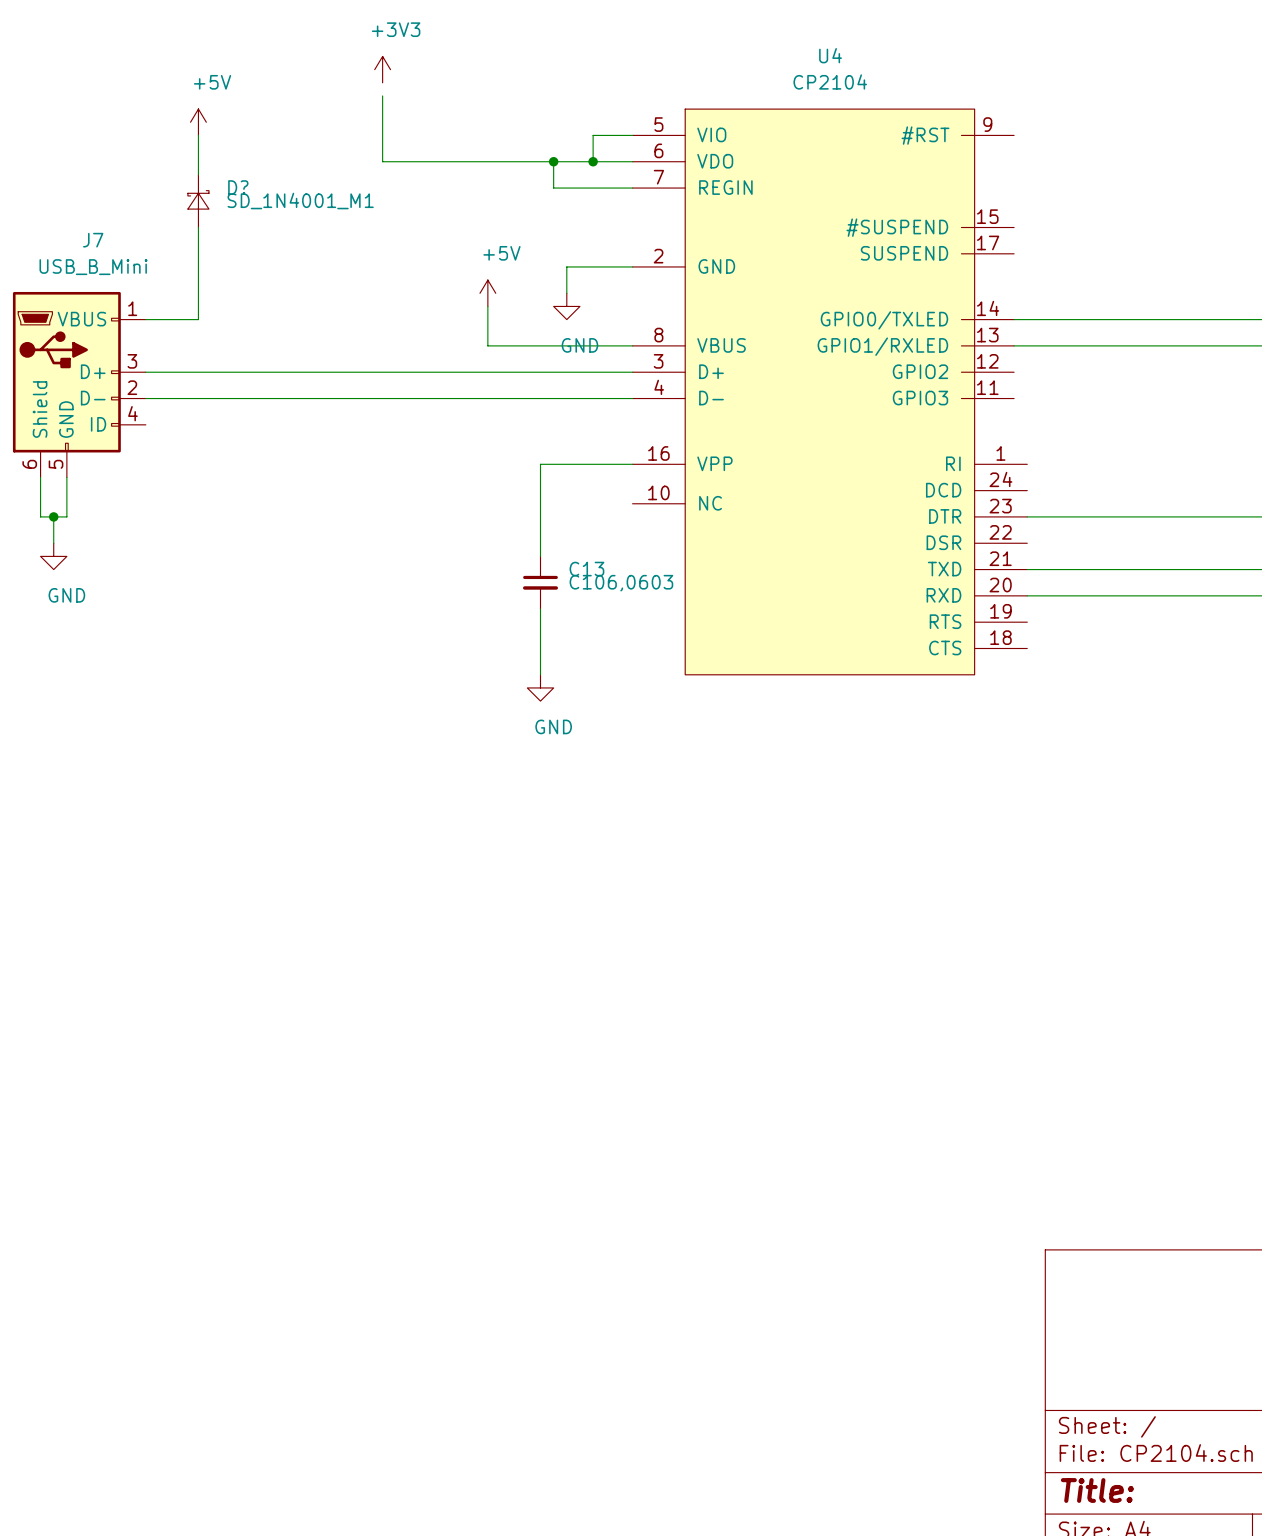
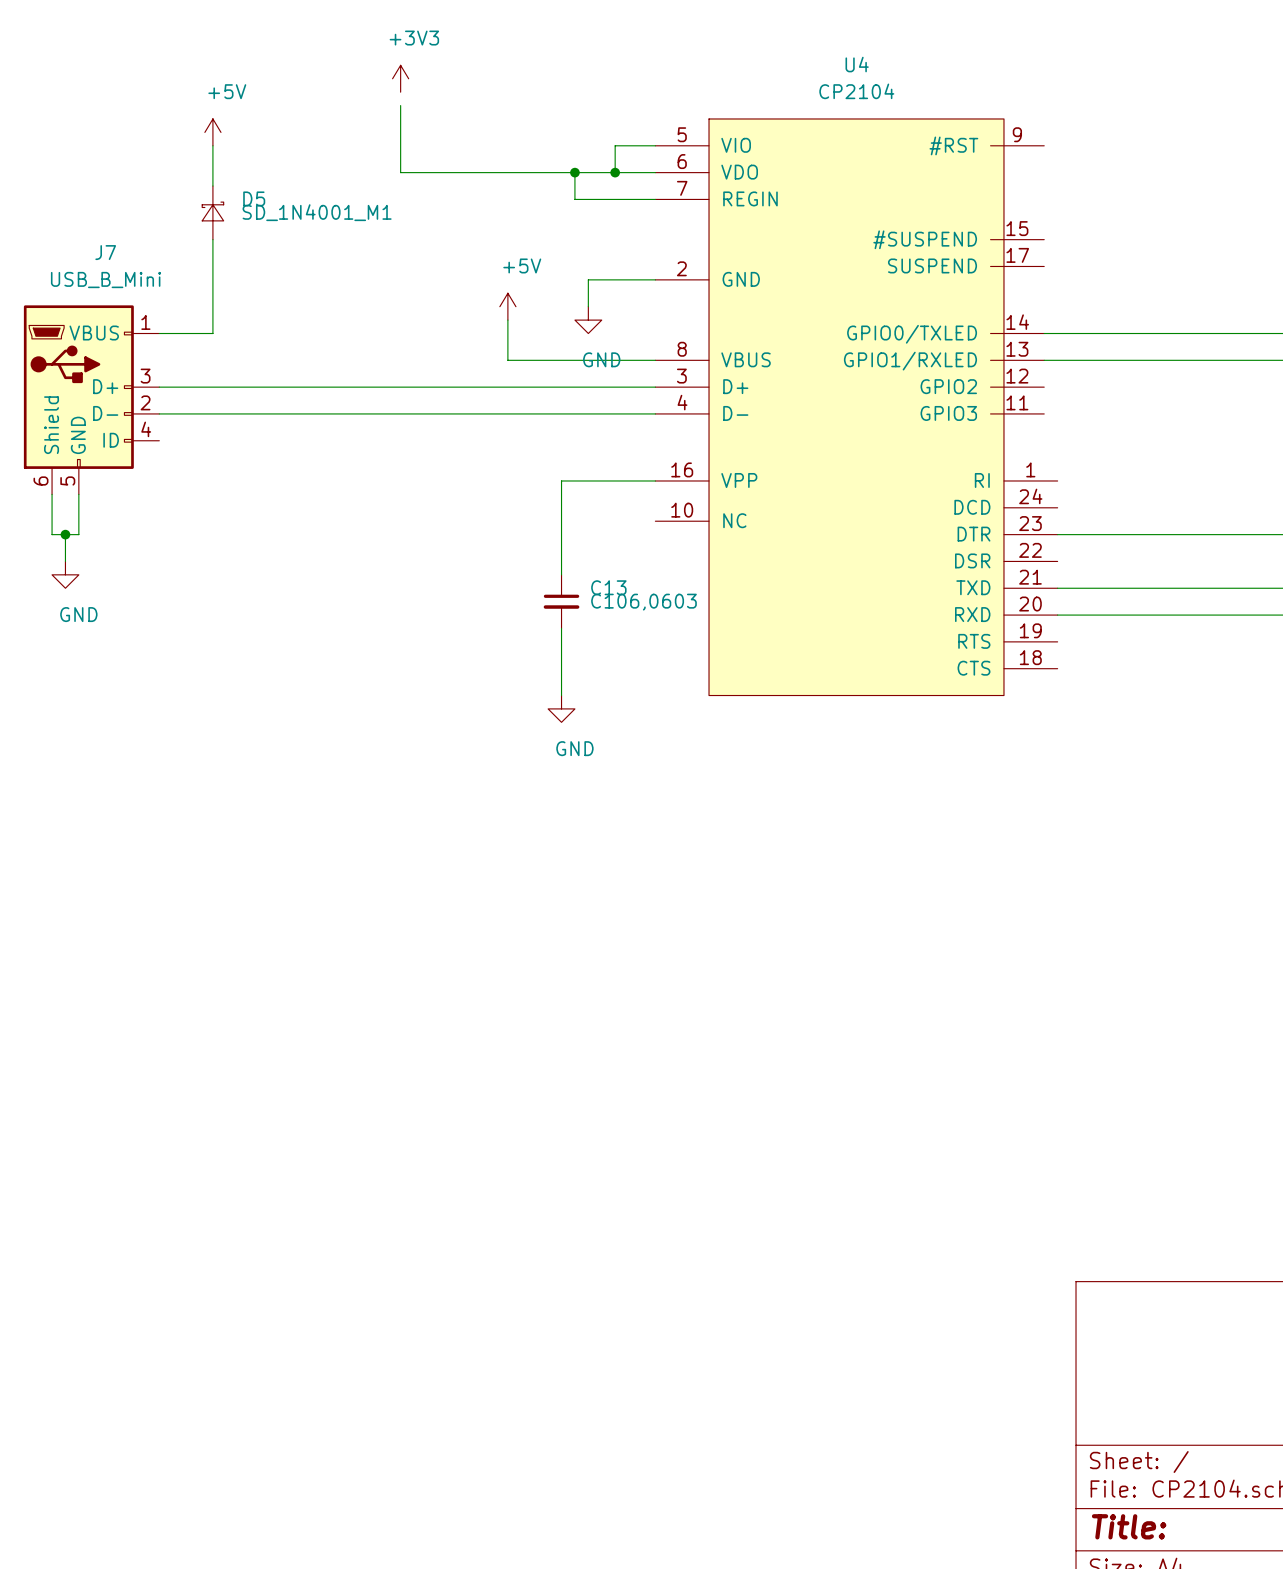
D? name: D? (238, 187) -> D5 (254, 198)

